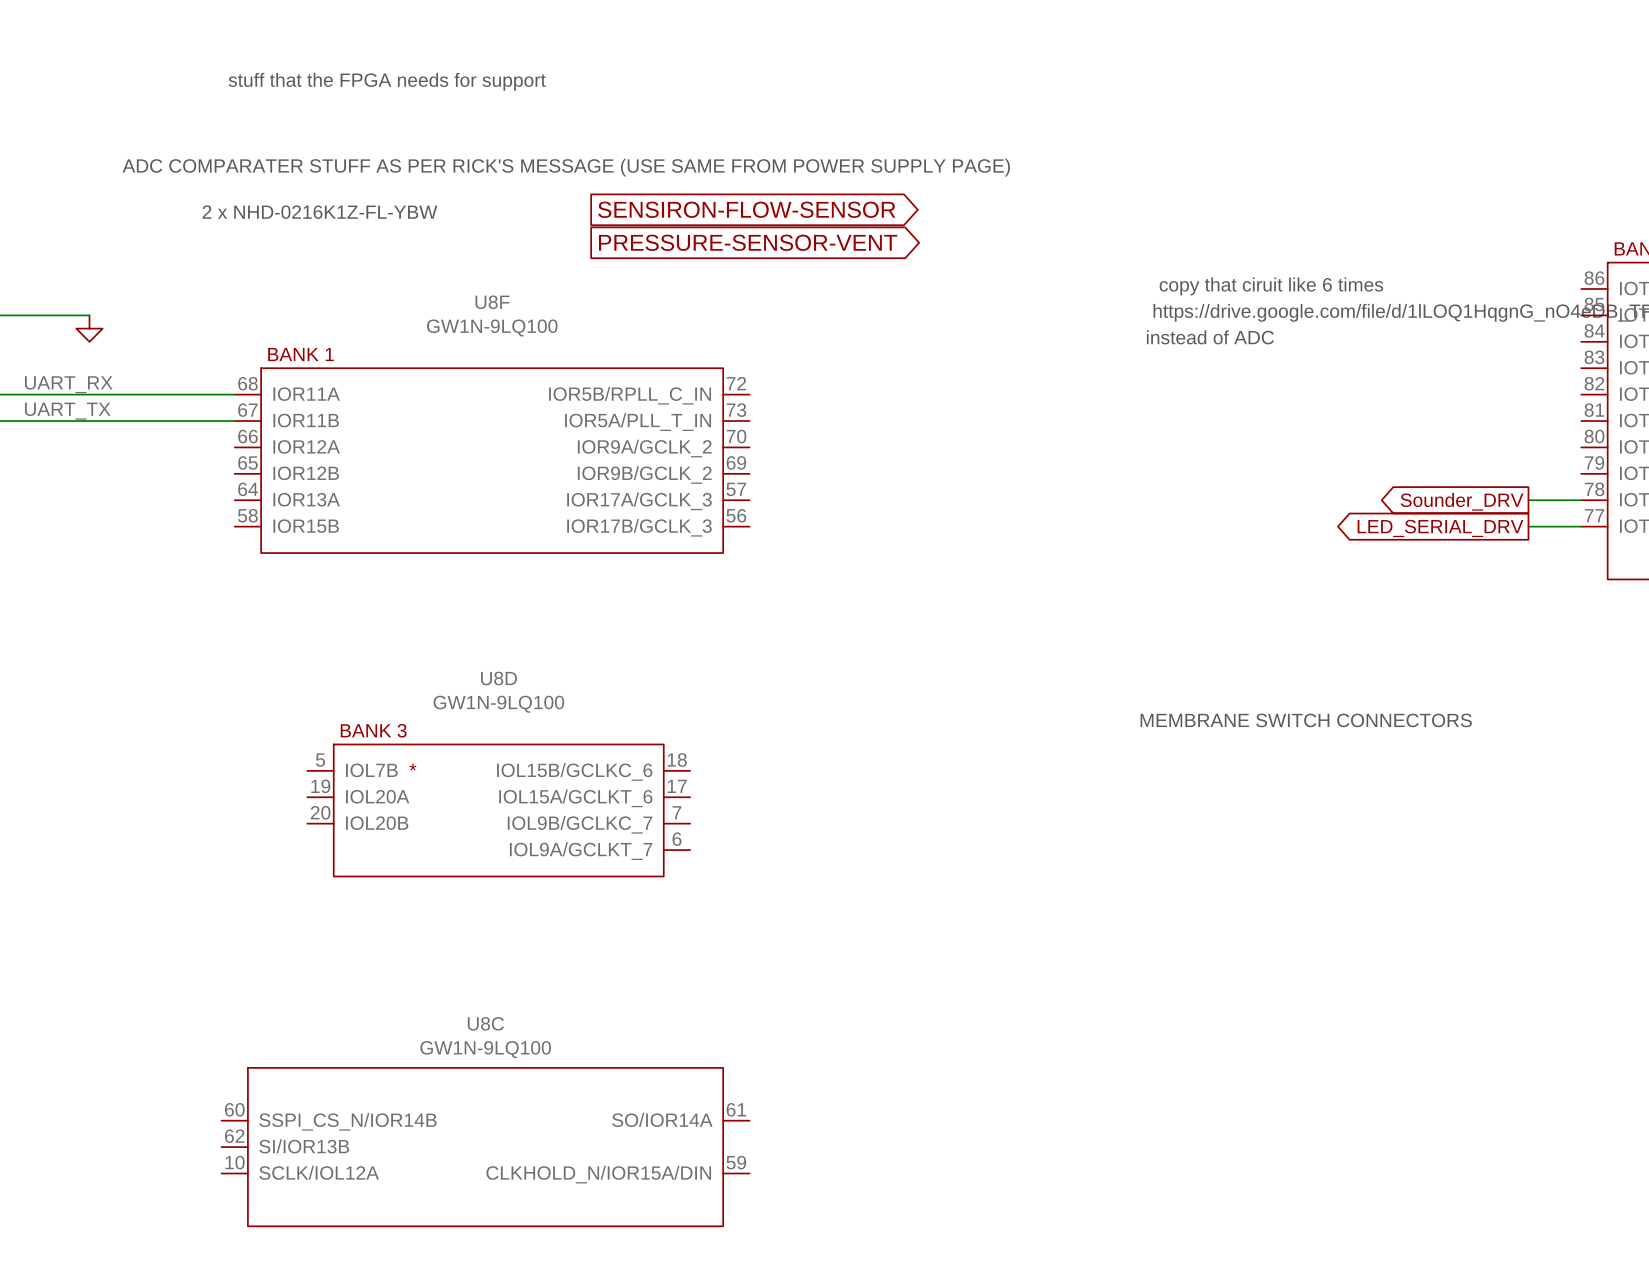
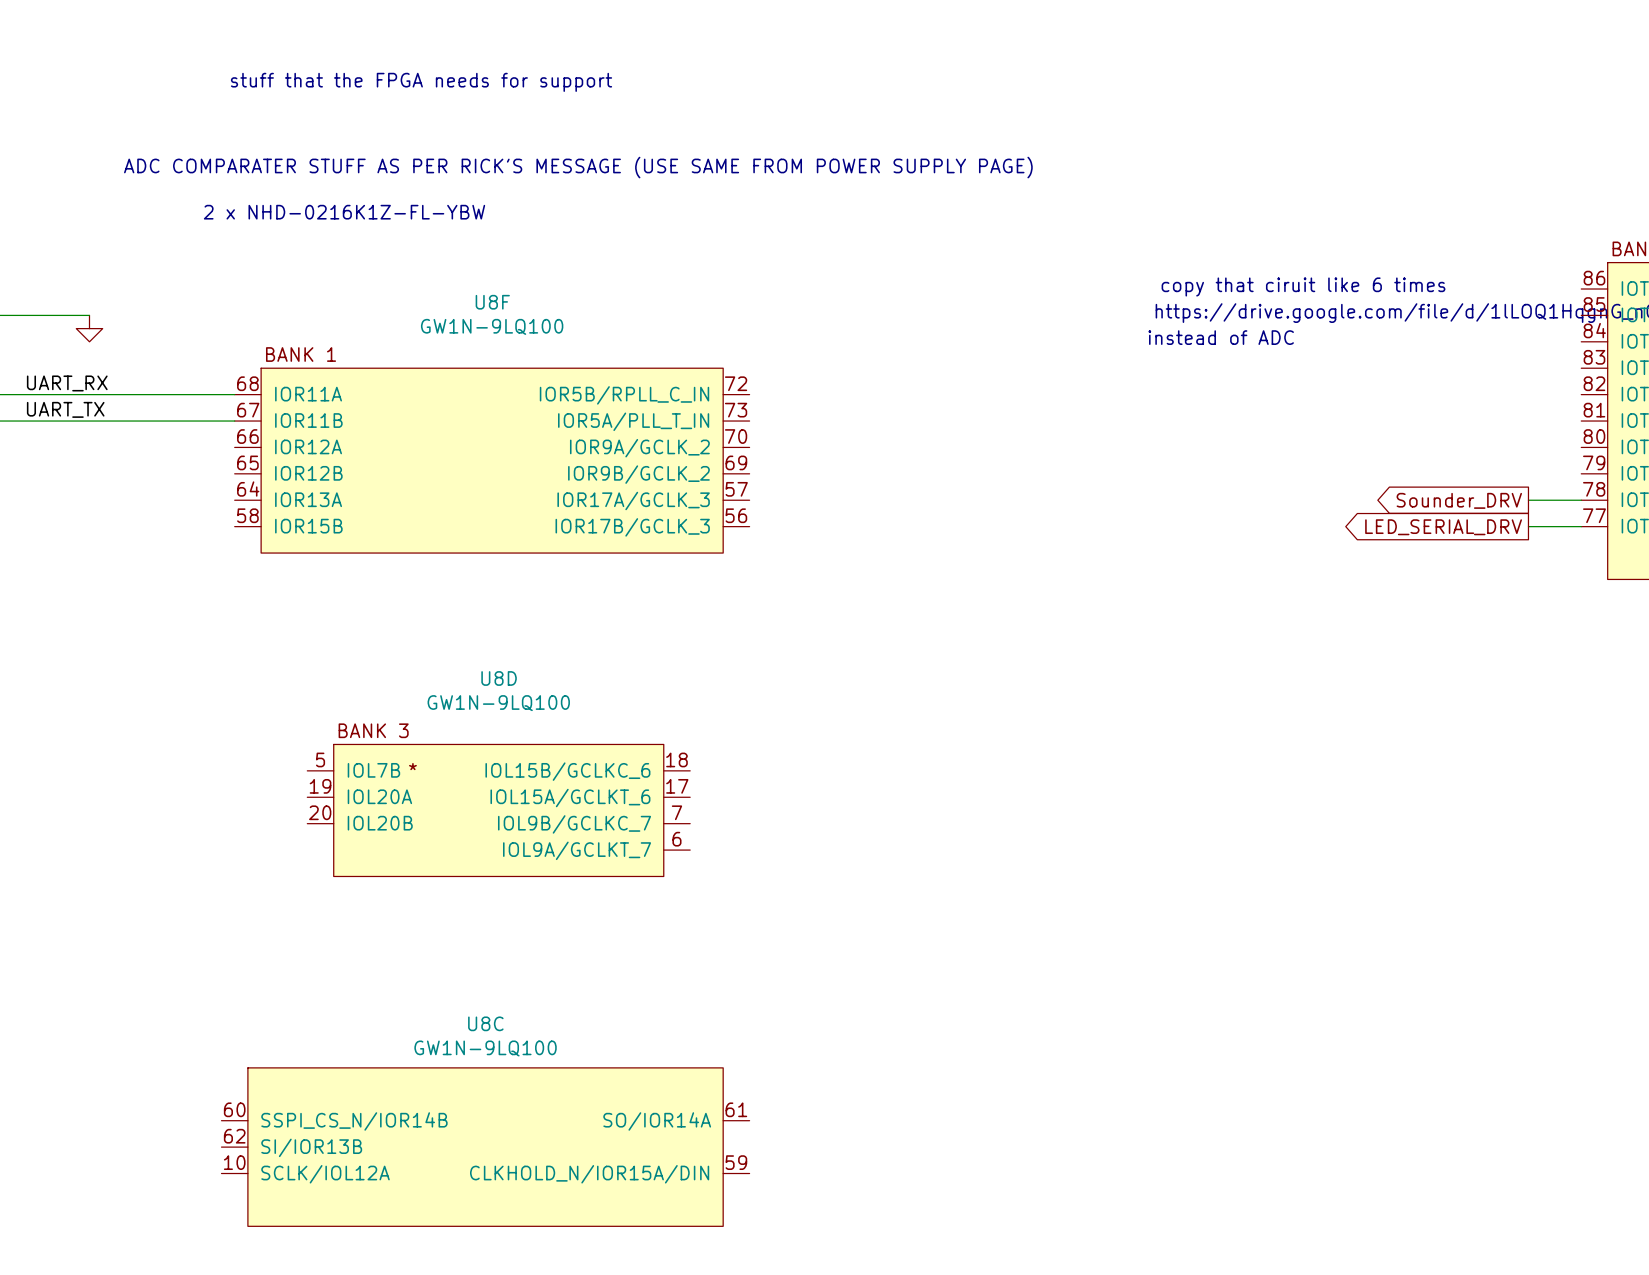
global label: SENSIRON-FLOW-SENSOR (746, 209) -> none
global label: PRESSURE-SENSOR-VENT (748, 242) -> none
text: MEMBRANE SWITCH CONNECTORS (1306, 720) -> none

